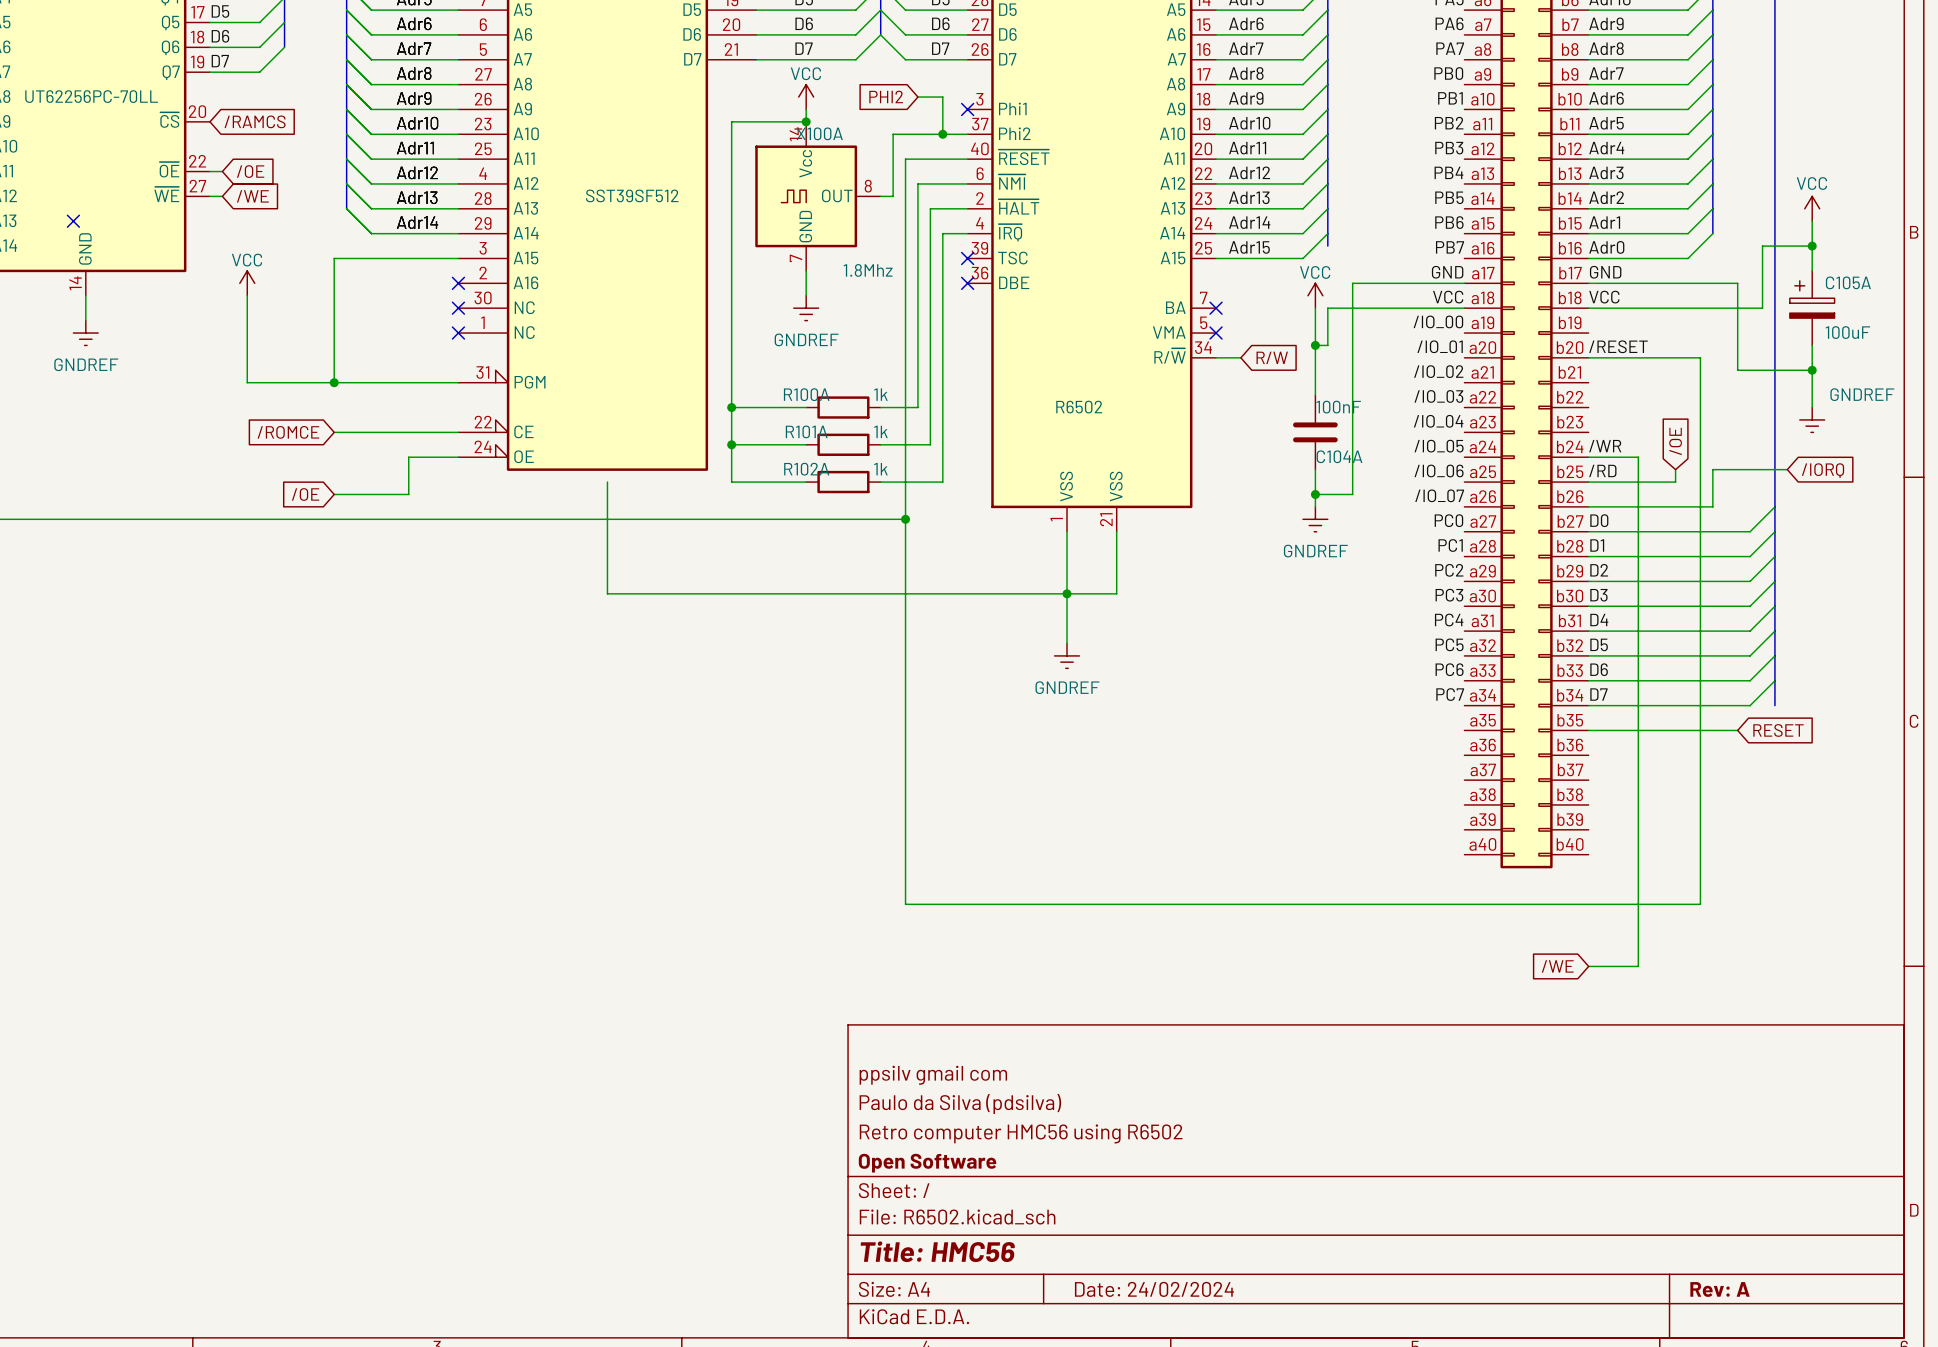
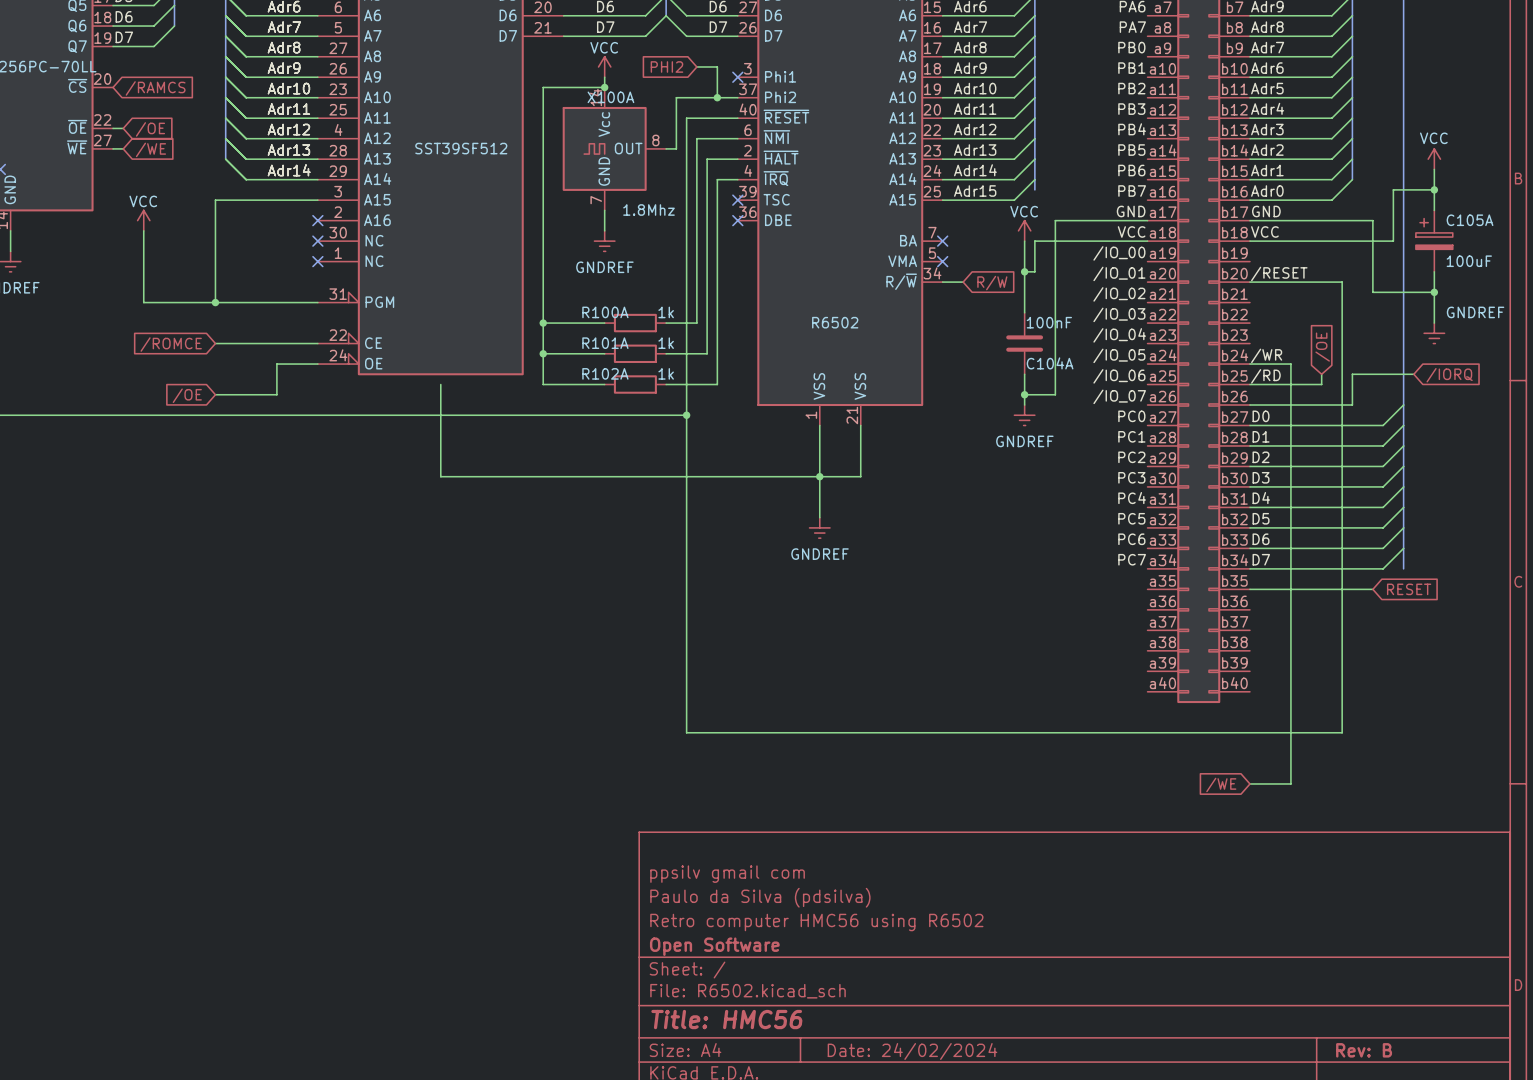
title block: Rev: A (1719, 1289) -> Rev: B (1364, 1050)

